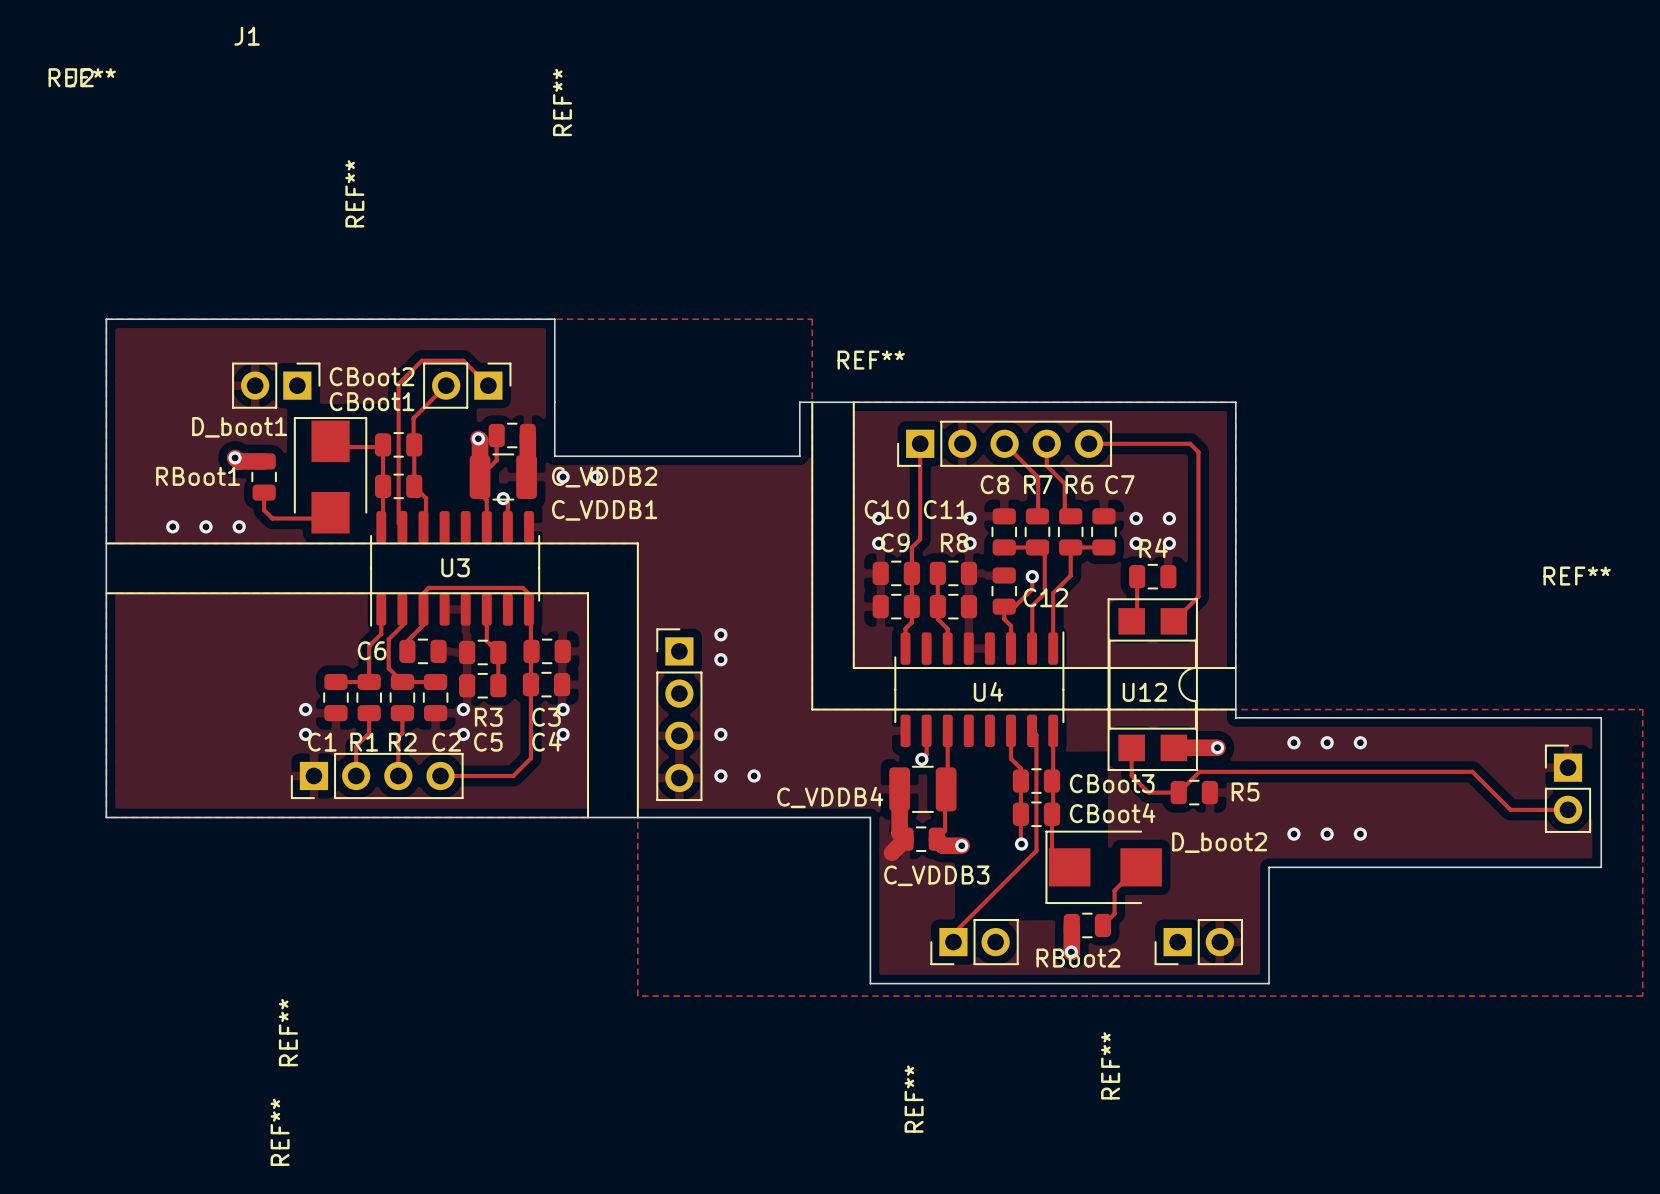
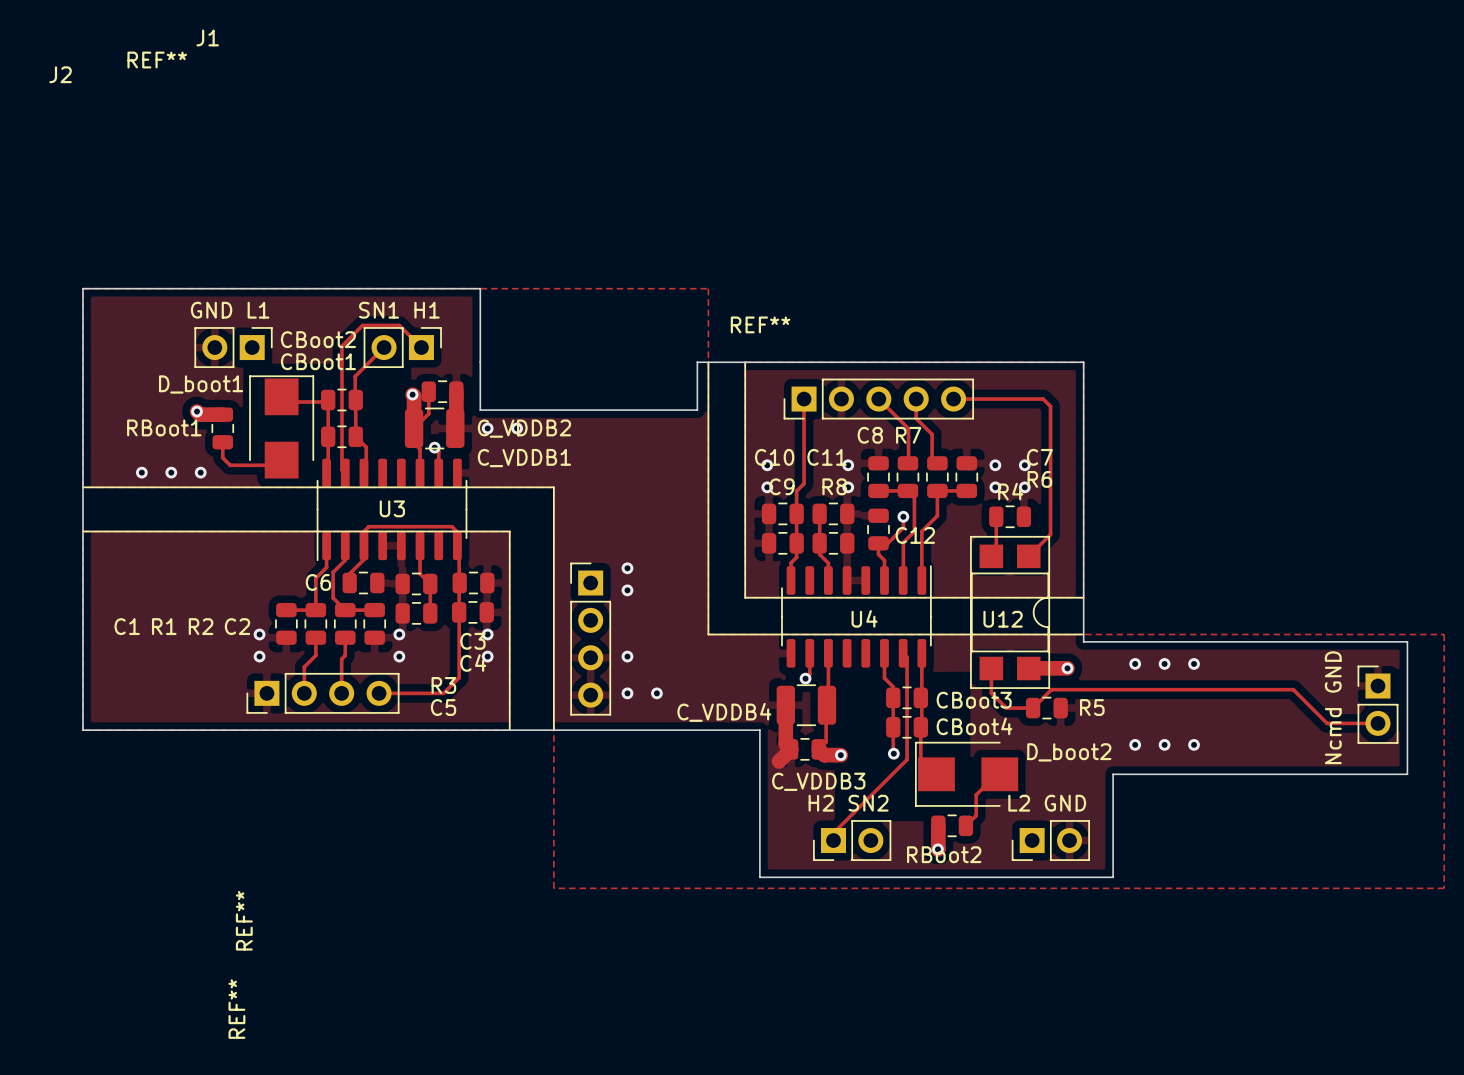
J1 footprint: [232, 362, 1592, 966] -> [194, 327, 1399, 861]
R6 name position: R6 (1079, 484) -> R6 (1039, 479)
C7 name position: C7 (1119, 484) -> C7 (1039, 457)
R3 name position: R3 (488, 717) -> R3 (443, 685)
C1 name position: C1 (322, 742) -> C1 (127, 626)
R1 name position: R1 (364, 742) -> R1 (164, 626)
R2 name position: R2 (402, 742) -> R2 (201, 626)
C2 name position: C2 (446, 742) -> C2 (237, 626)
C5 name position: C5 (488, 742) -> C5 (443, 707)

